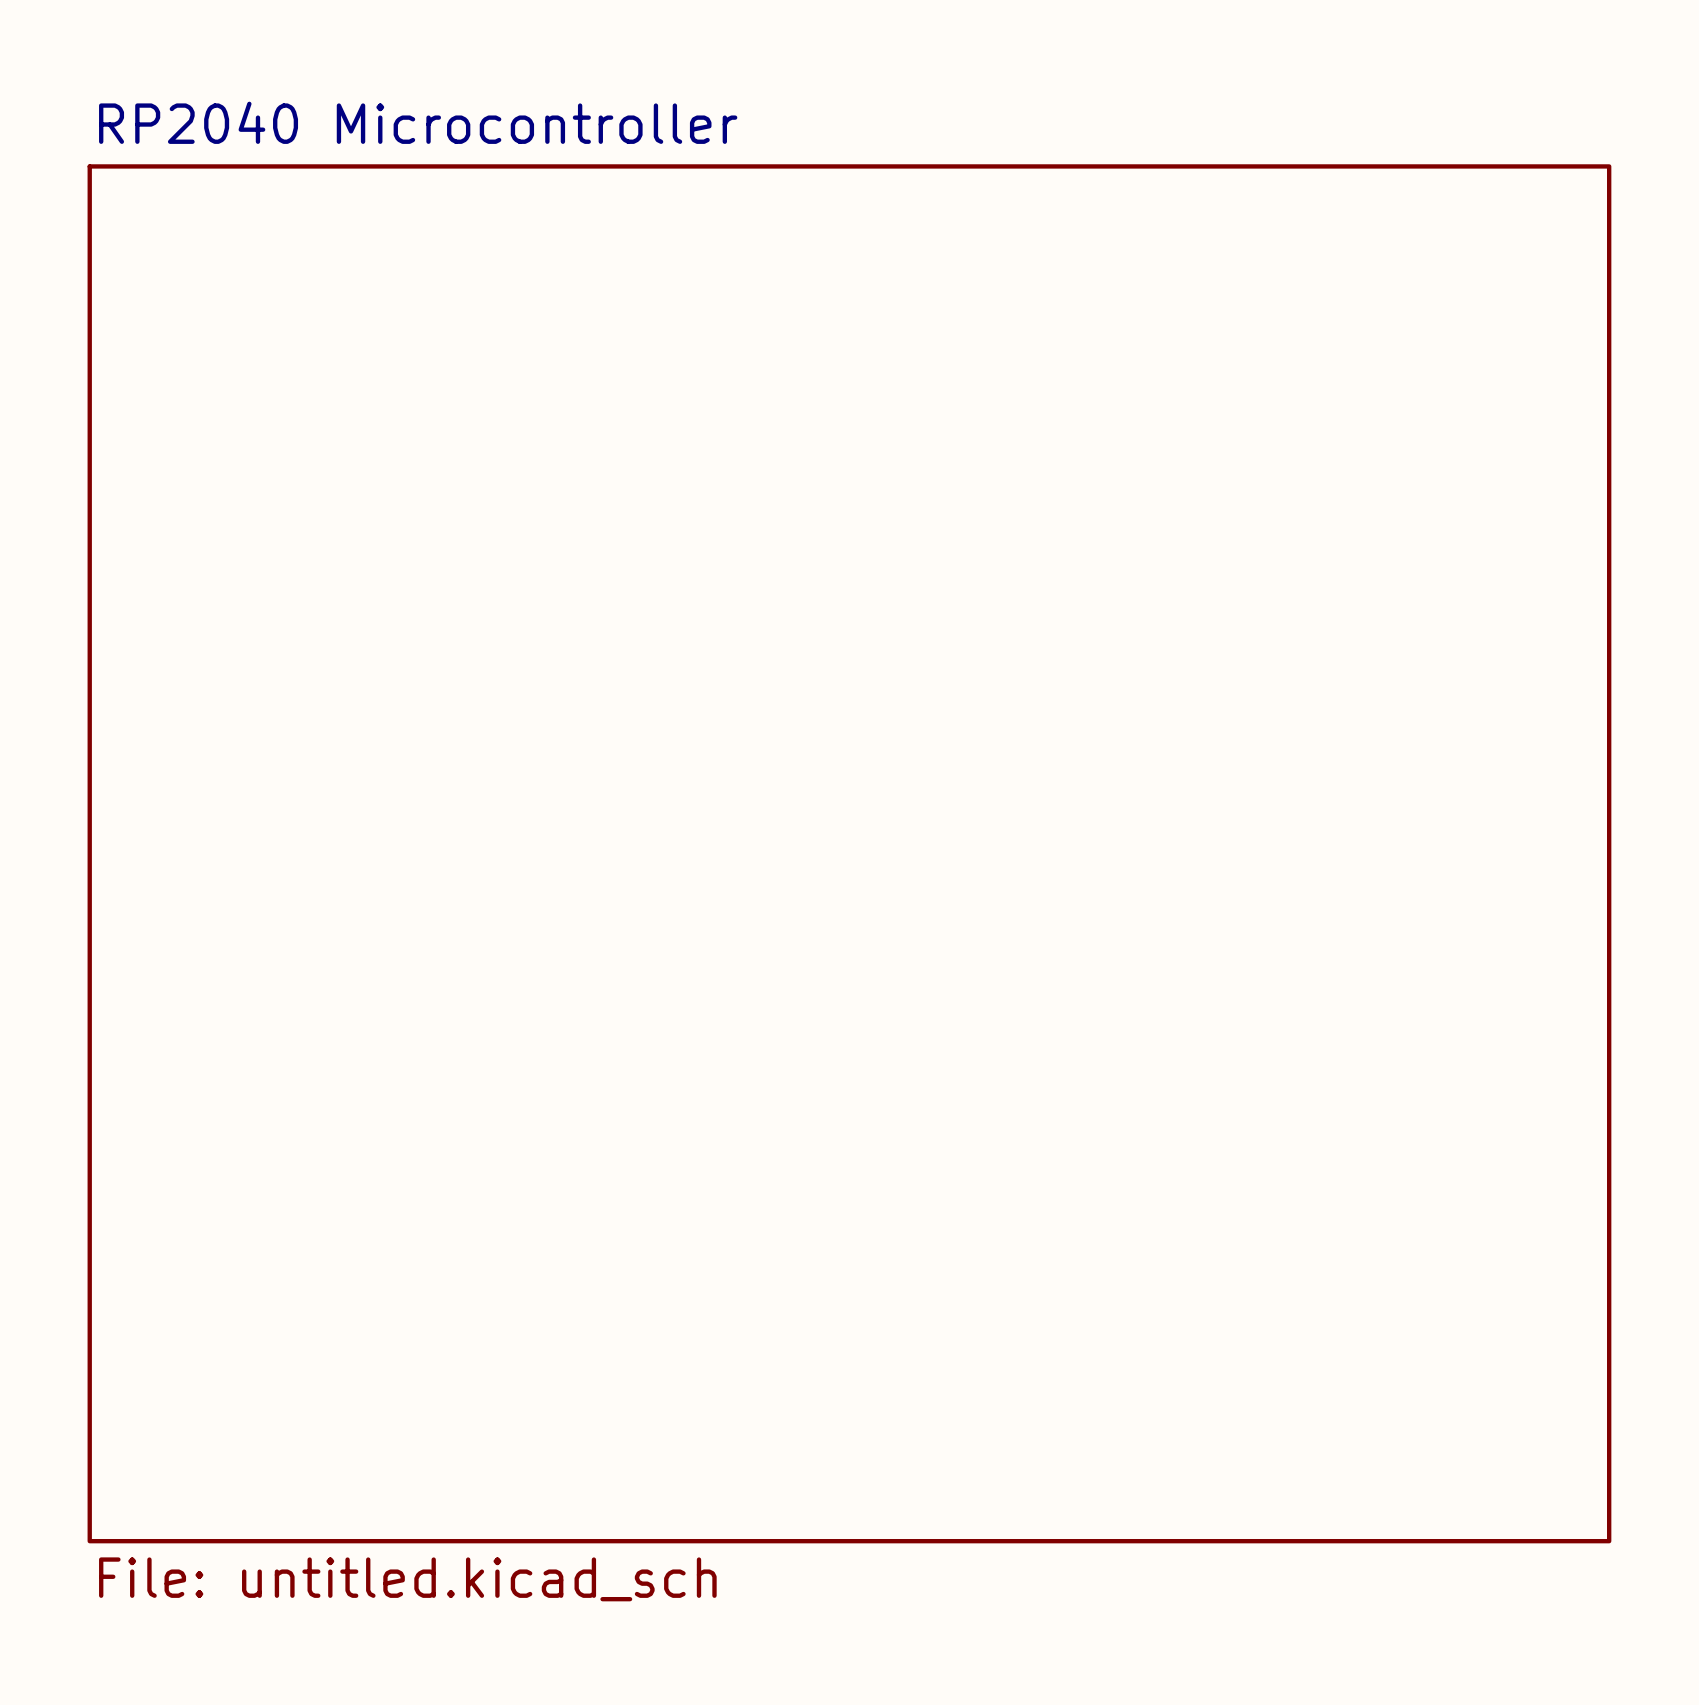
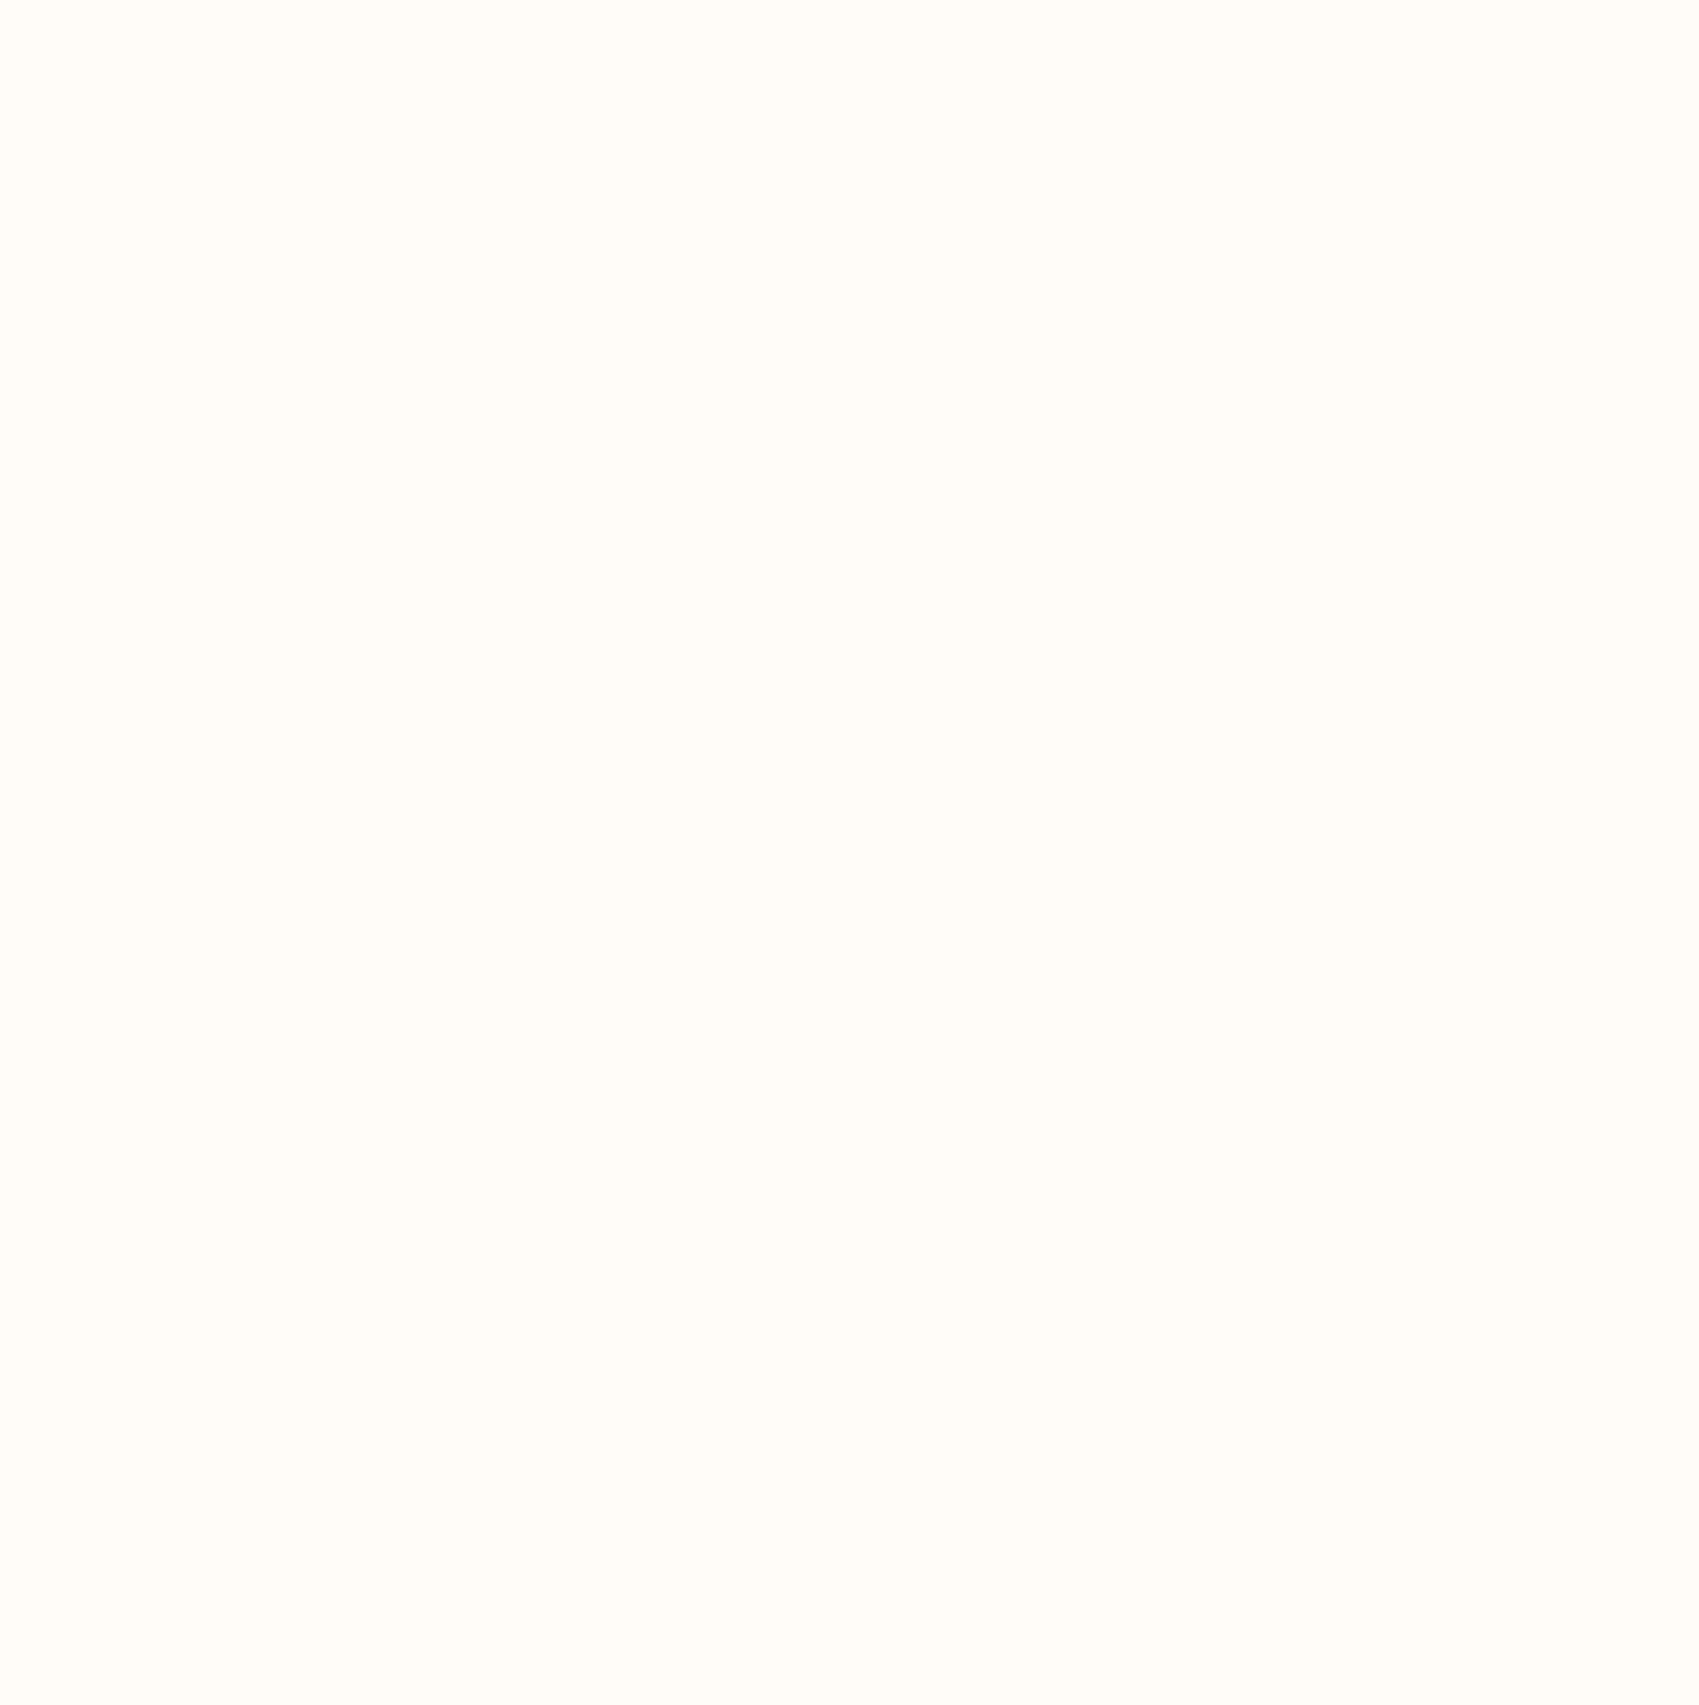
sheet RP2040 Microcontroller: File: untitled.kicad_sch (849, 853) -> none

